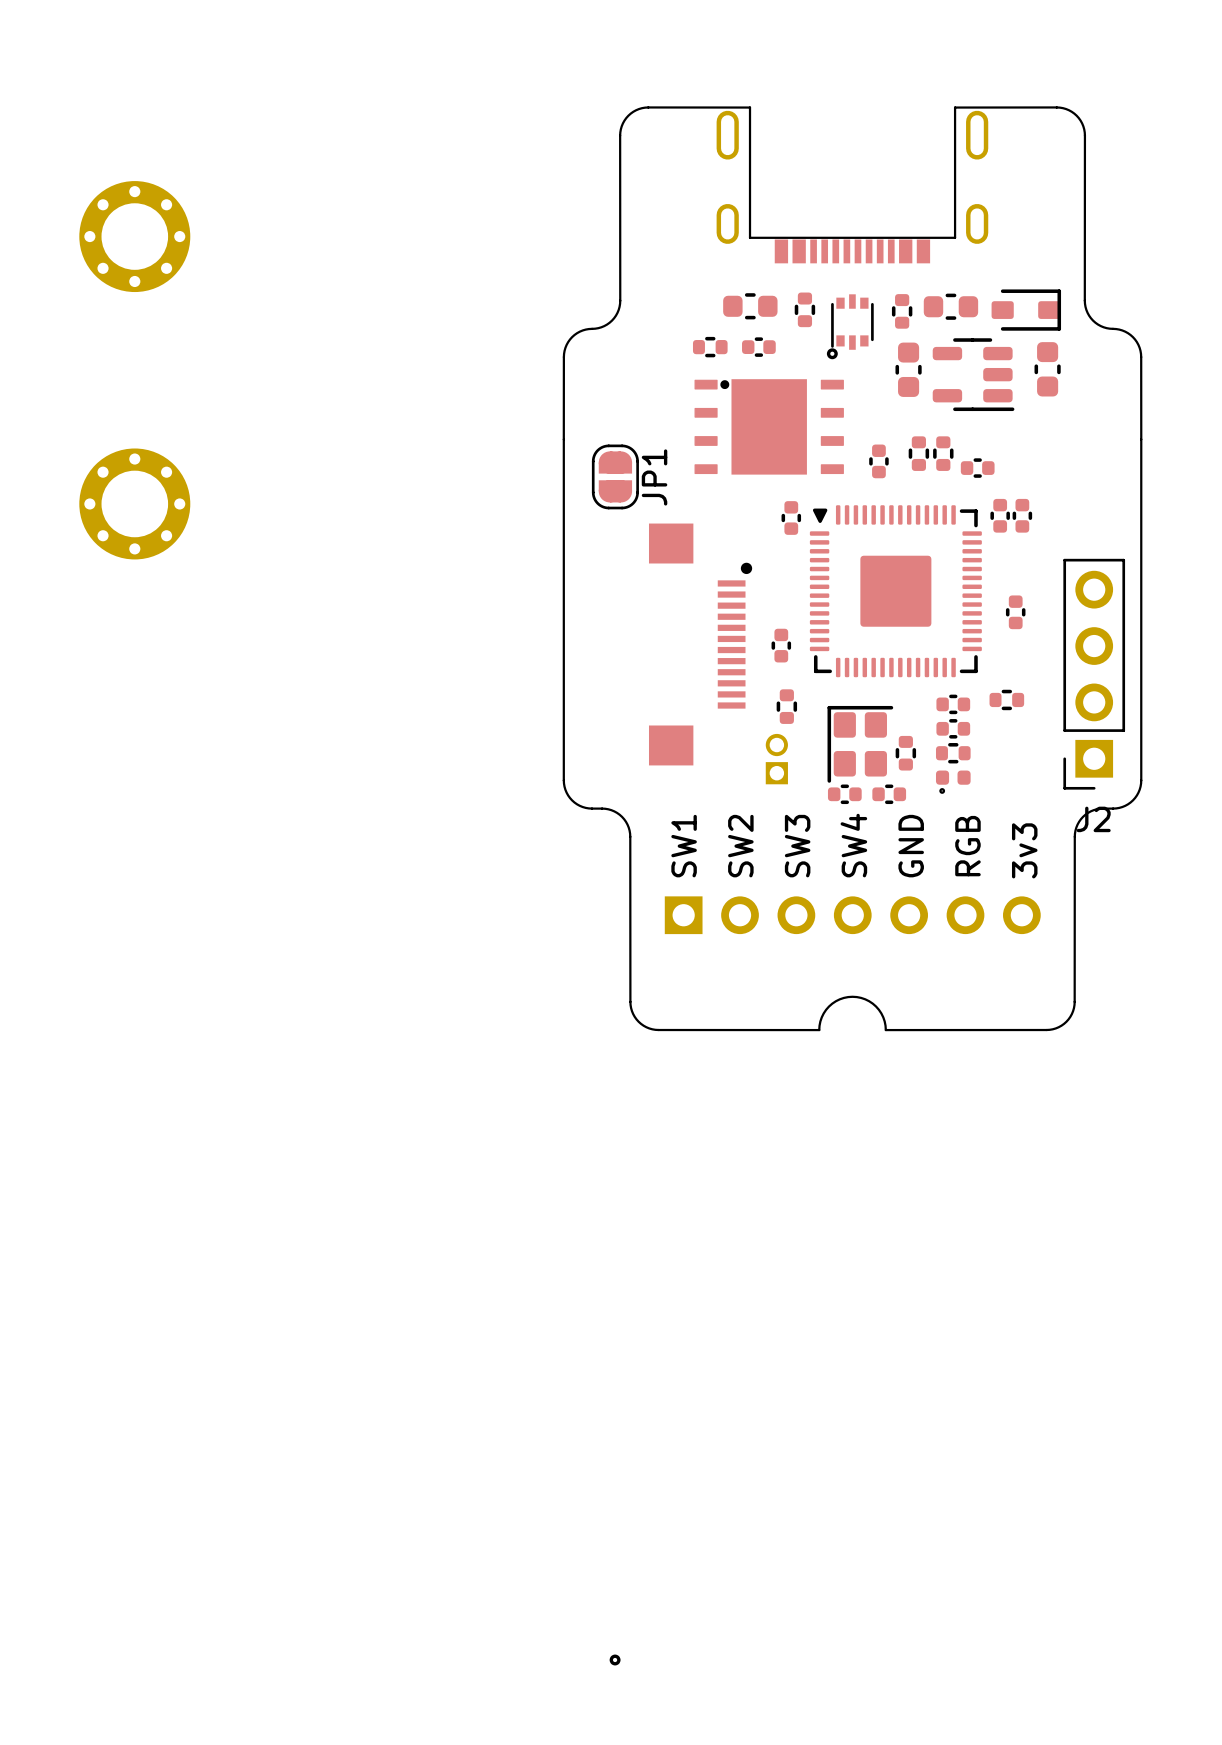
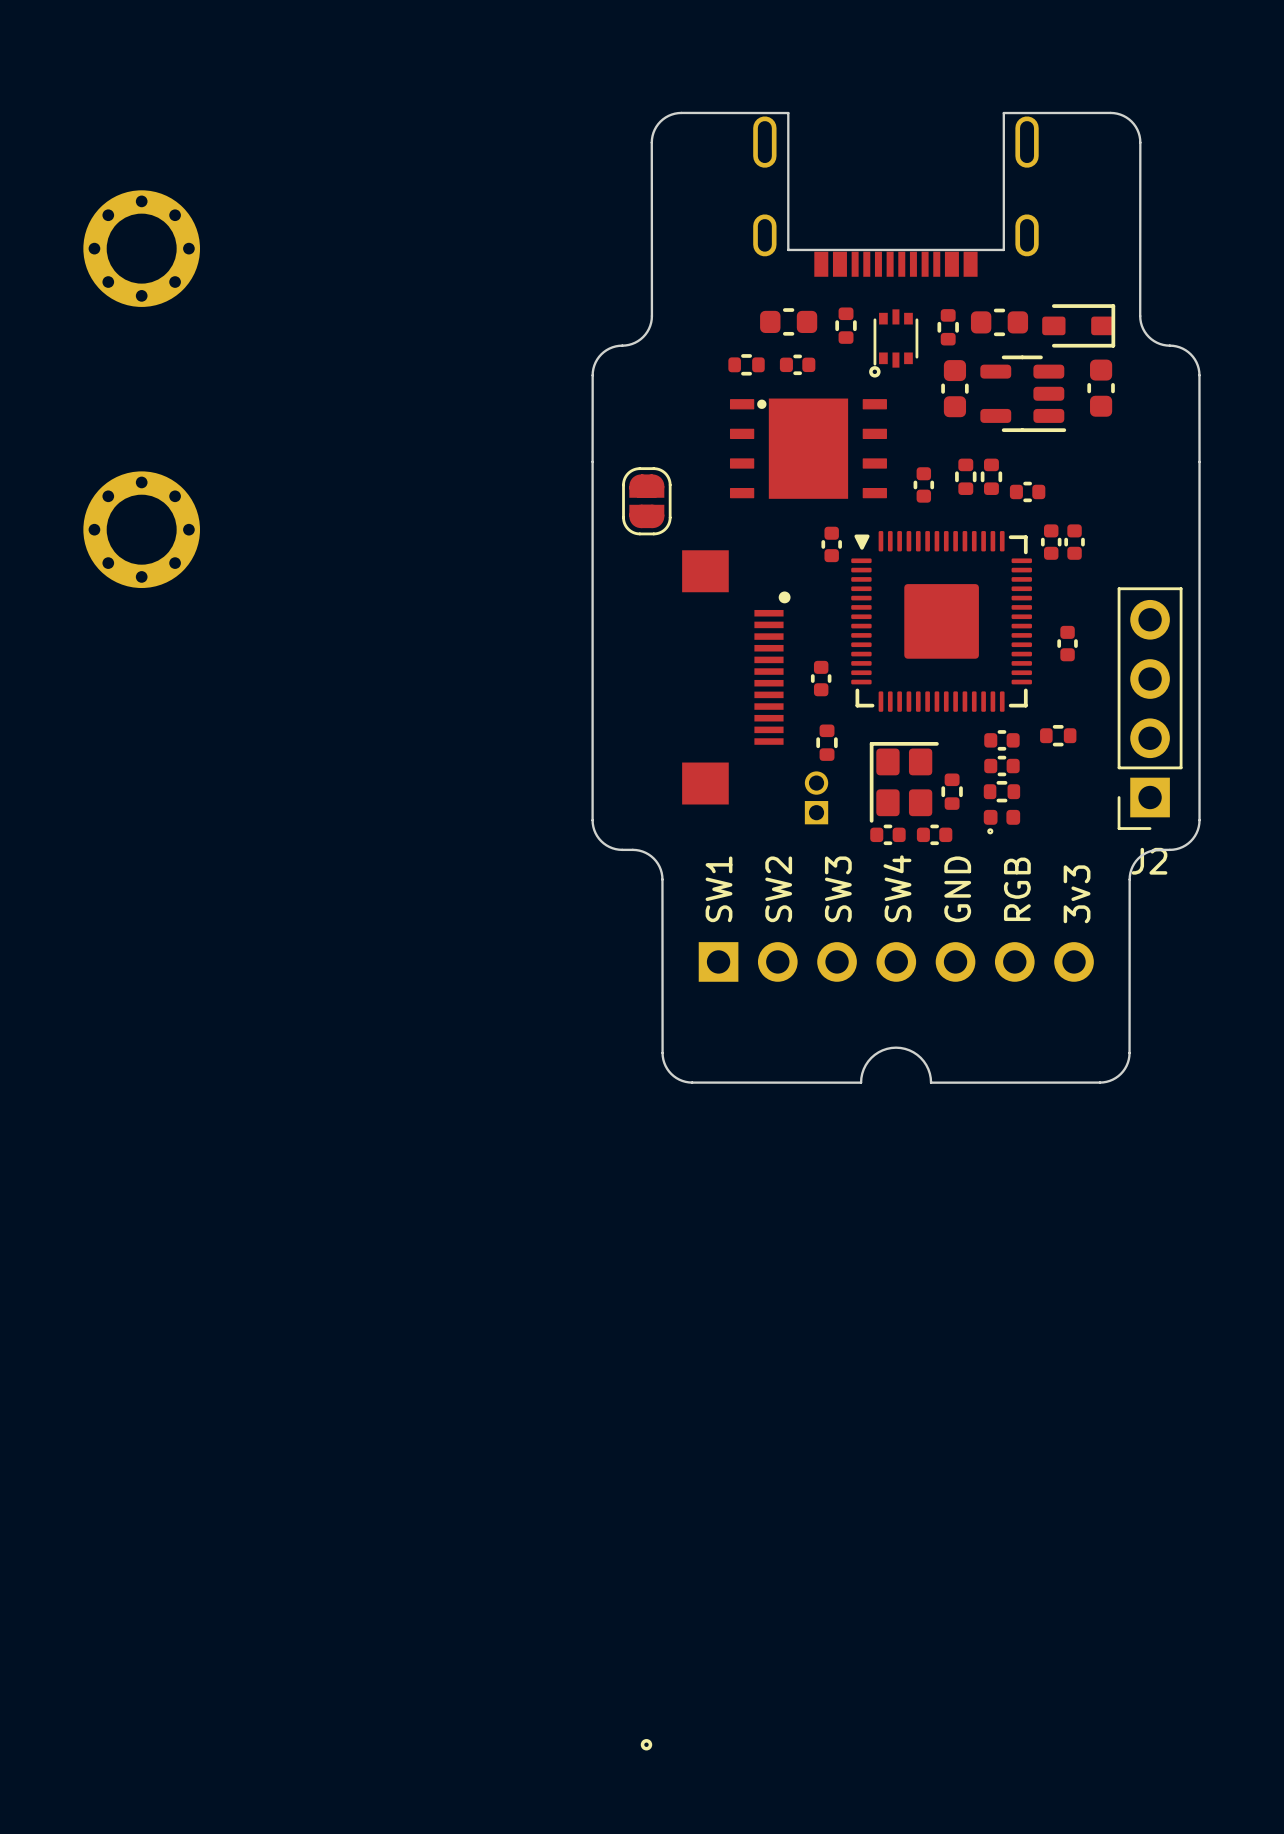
JP1 name: JP1 (654, 477) -> none

